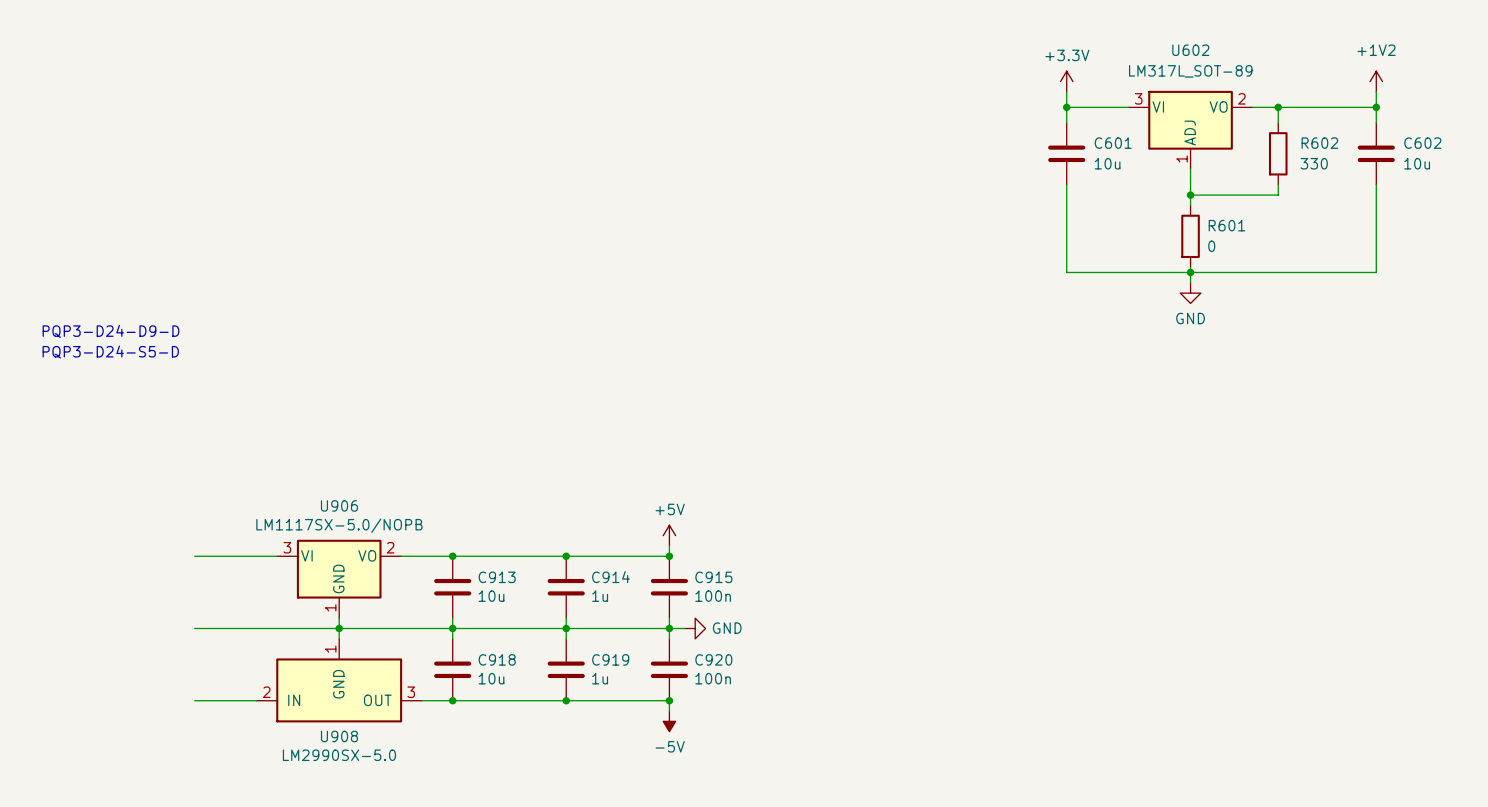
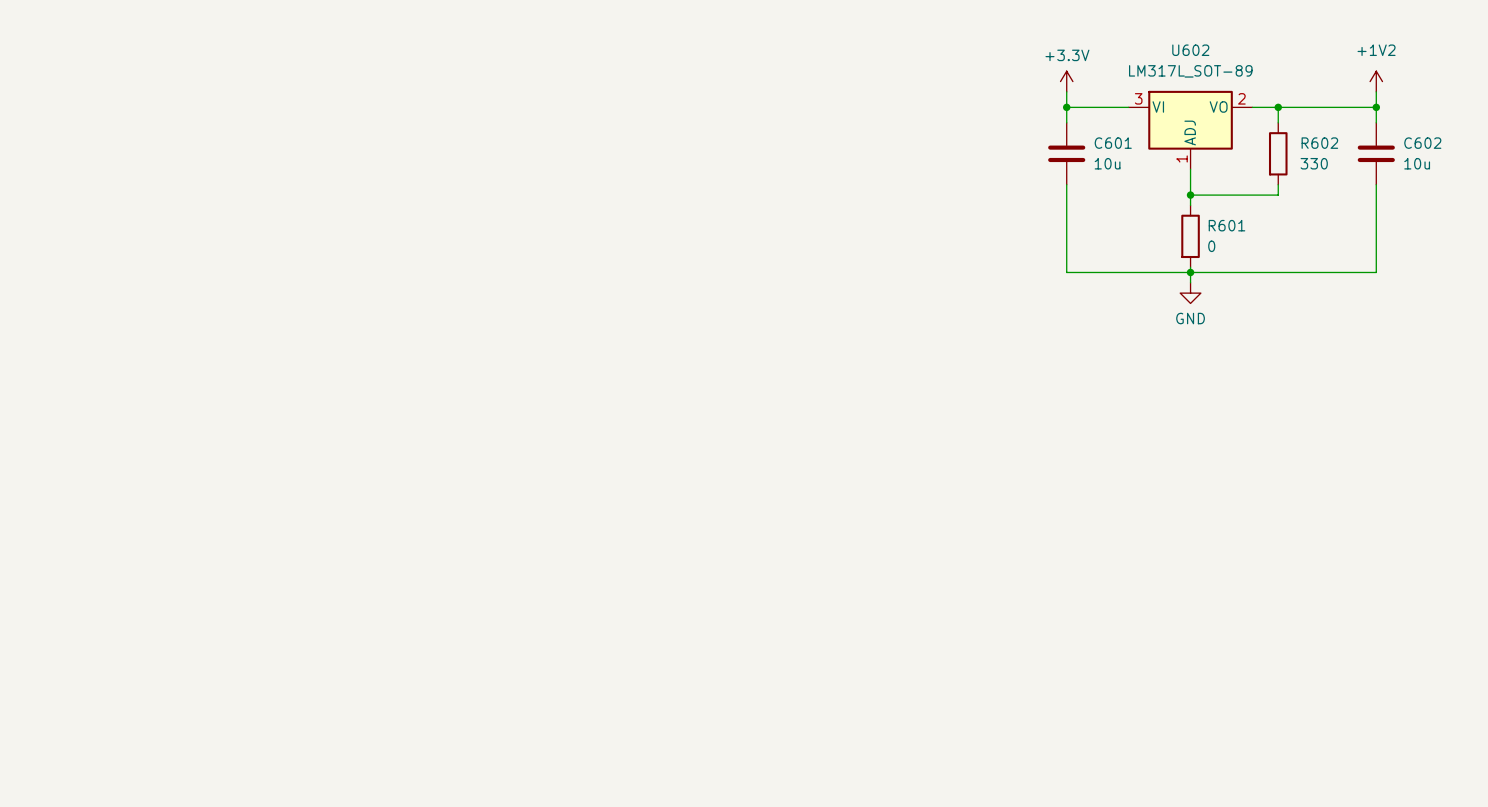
text: PQP3-D24-D9-D (111, 331) -> none
text: PQP3-D24-S5-D (110, 351) -> none
power symbol: +5V (669, 535) -> none
wire: (669, 545) (669, 556) (401, 556) -> none
wire: (194, 556) (277, 556) -> none
junction: (452, 556) -> none
junction: (566, 556) -> none
junction: (669, 556) -> none
U906: LM1117SX-5.0/NOPB (339, 578) -> none
C913: 10u (452, 587) -> none
C914: 1u (566, 587) -> none
C915: 100n (669, 587) -> none
wire: (339, 618) (339, 638) -> none
wire: (452, 618) (452, 638) -> none
wire: (566, 618) (566, 638) -> none
wire: (669, 618) (669, 638) -> none
wire: (194, 628) (684, 628) -> none
junction: (339, 628) -> none
junction: (452, 628) -> none
junction: (566, 628) -> none
junction: (669, 628) -> none
power symbol: GND (695, 628) -> none
C918: 10u (452, 669) -> none
C919: 1u (566, 669) -> none
C920: 100n (669, 669) -> none
U908: LM2990SX-5.0 (339, 680) -> none
wire: (194, 700) (256, 700) -> none
wire: (421, 700) (669, 700) (669, 711) -> none
junction: (452, 700) -> none
junction: (566, 700) -> none
junction: (669, 700) -> none
power symbol: -5V (669, 721) -> none

